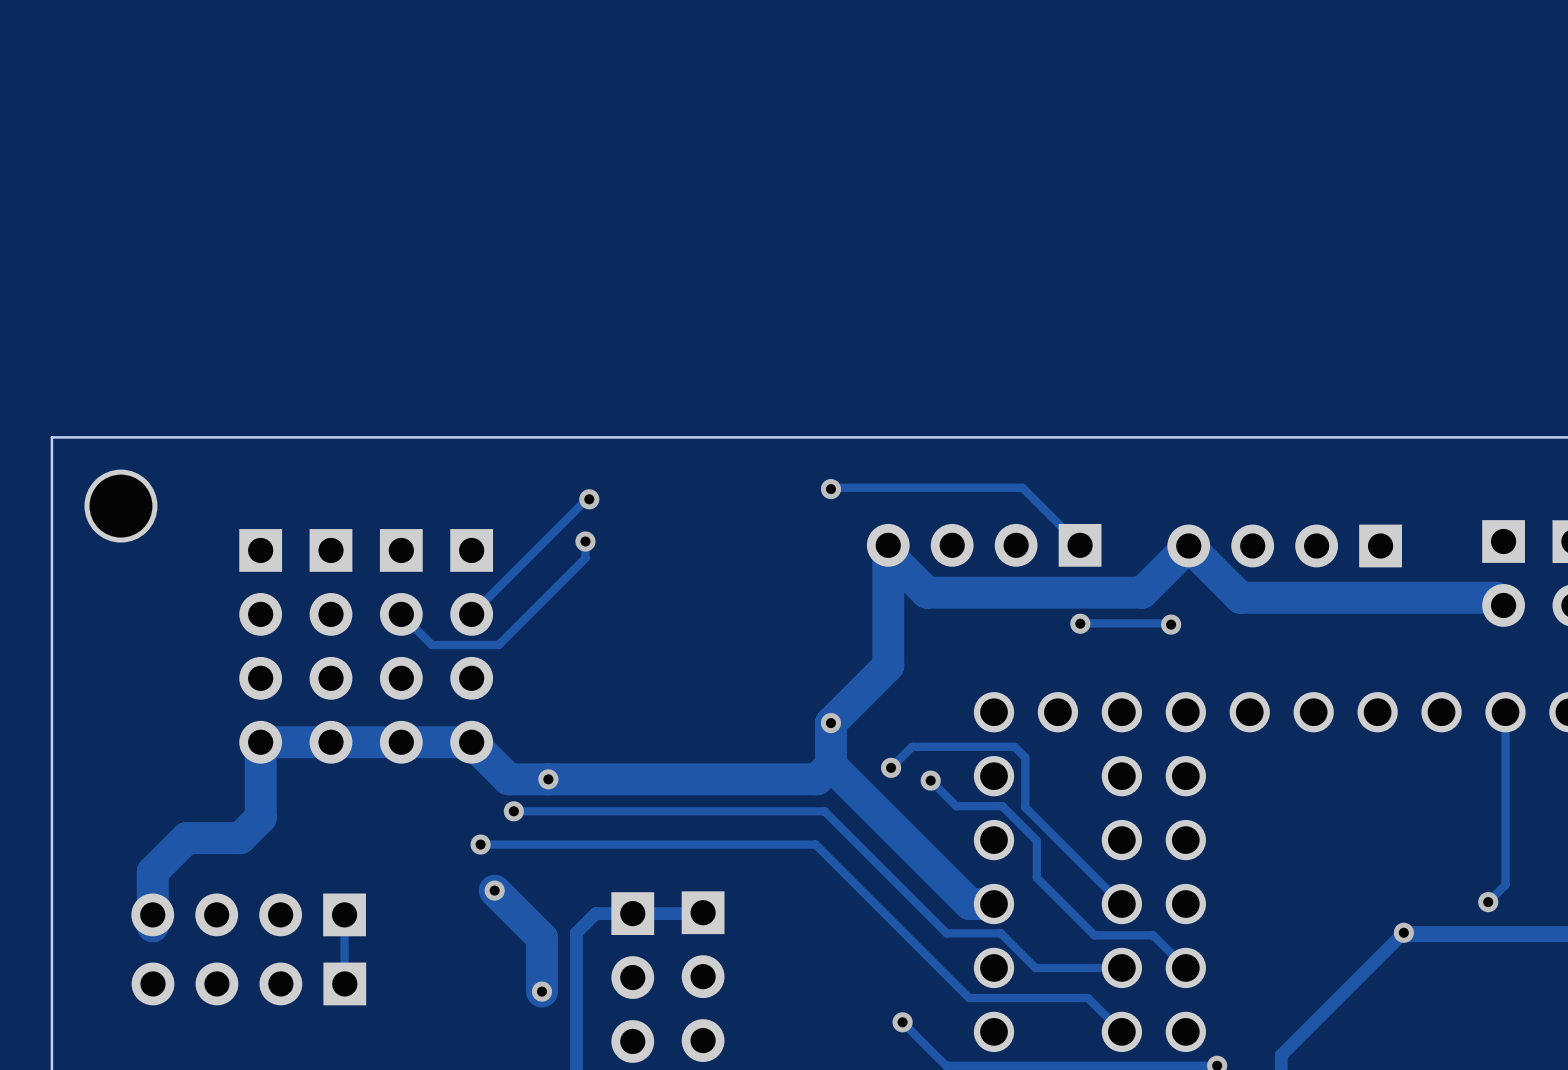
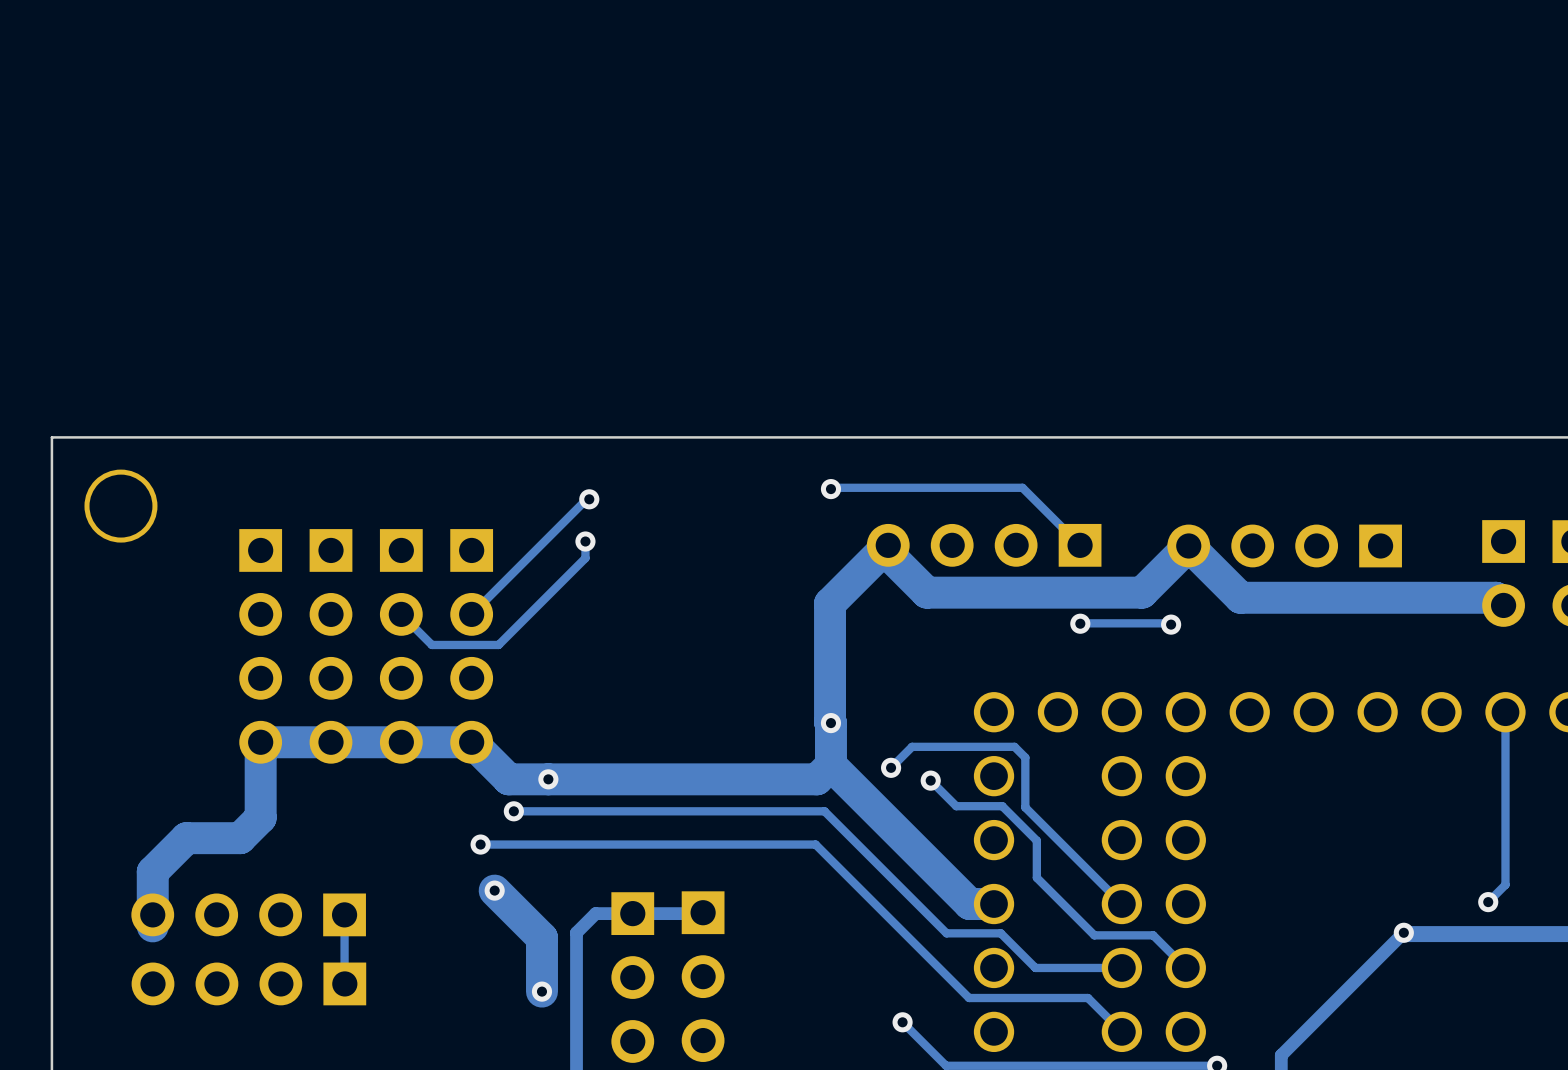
track: (888, 554) (888, 665) (830, 723) -> (888, 545) (830, 603) (830, 723)

